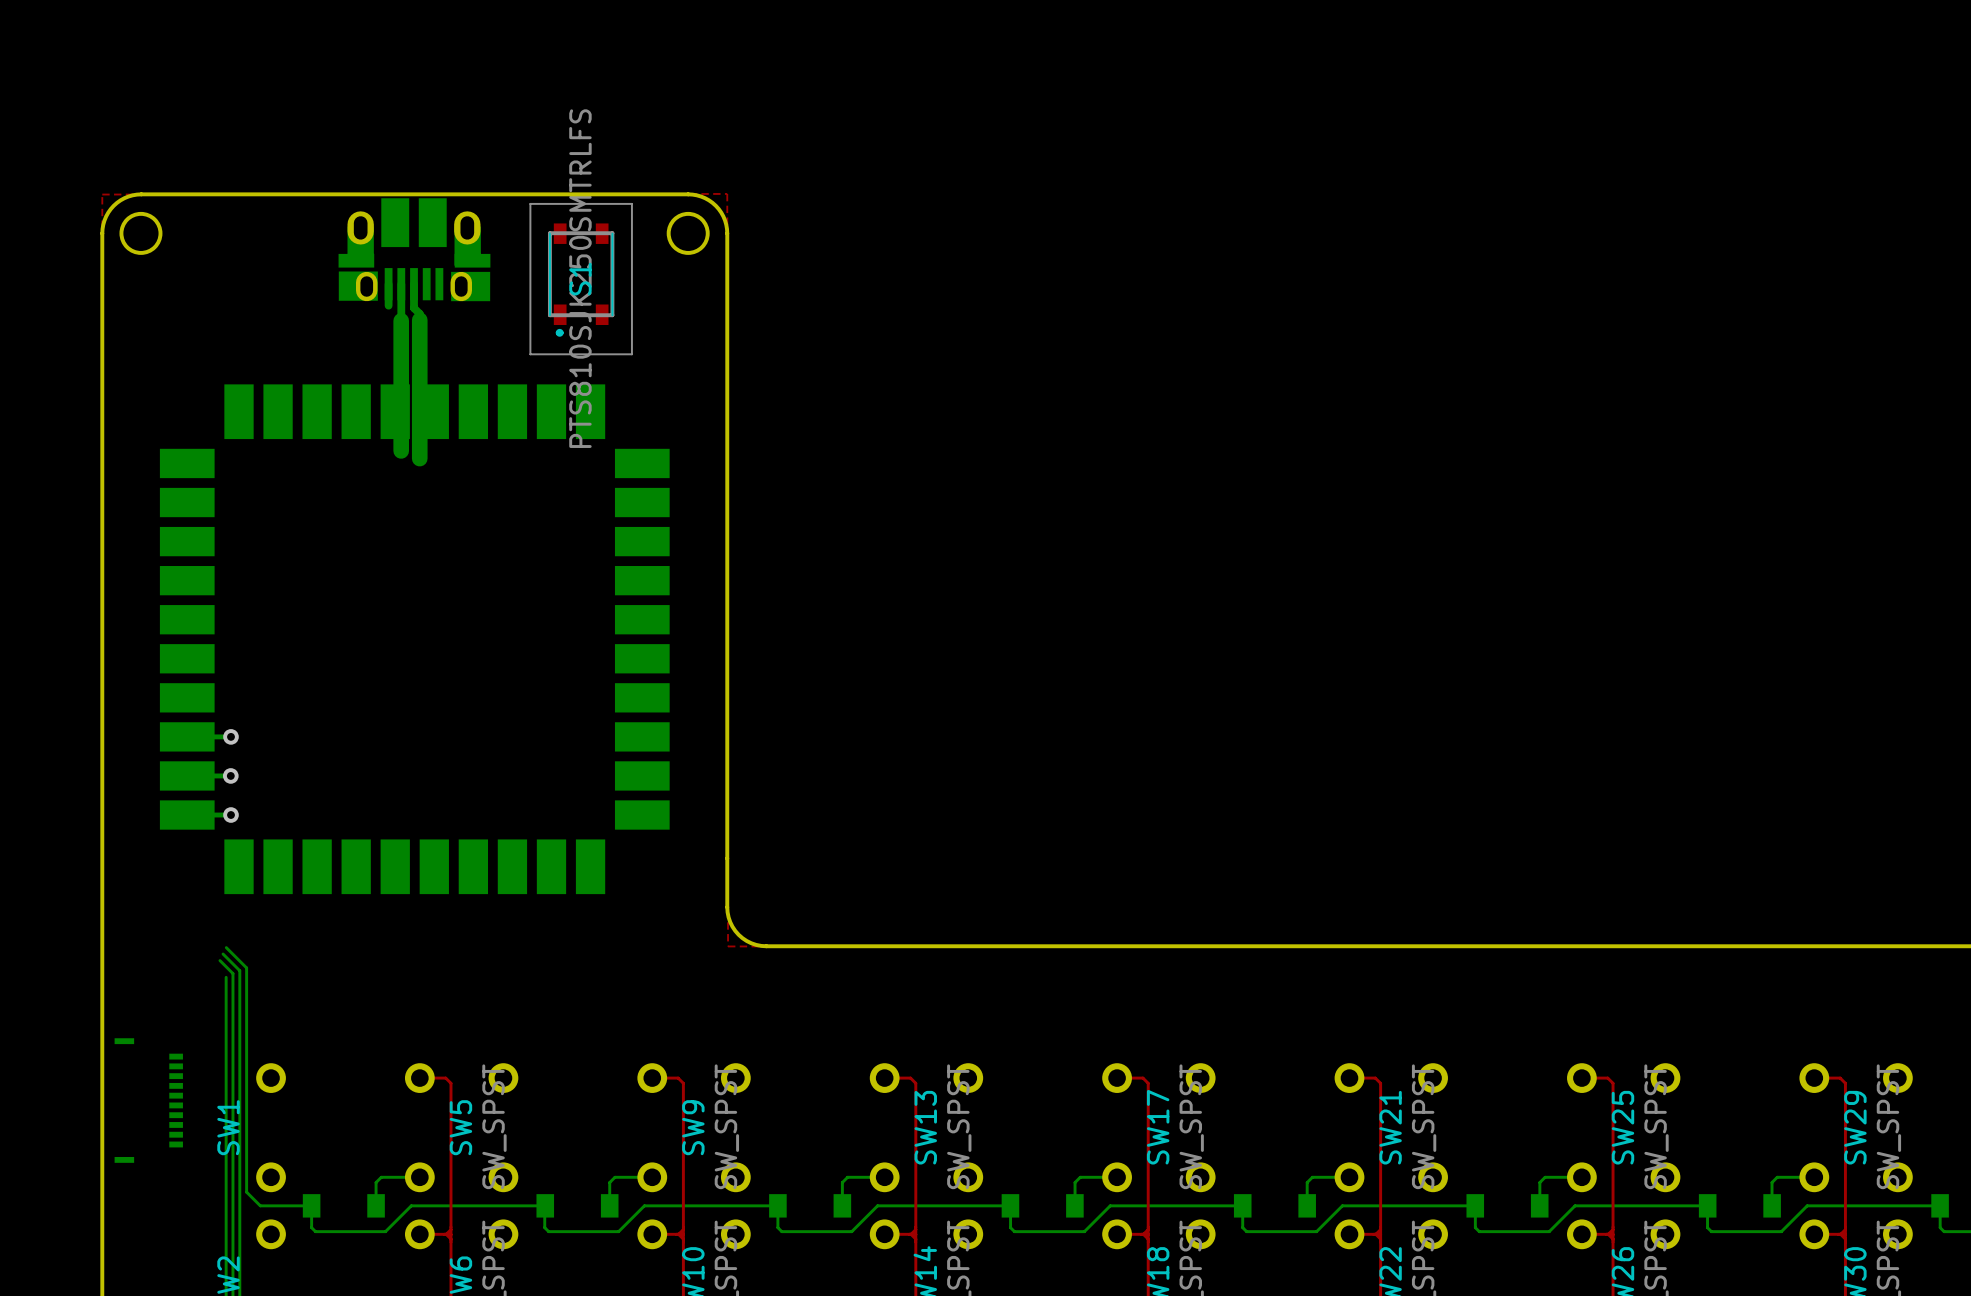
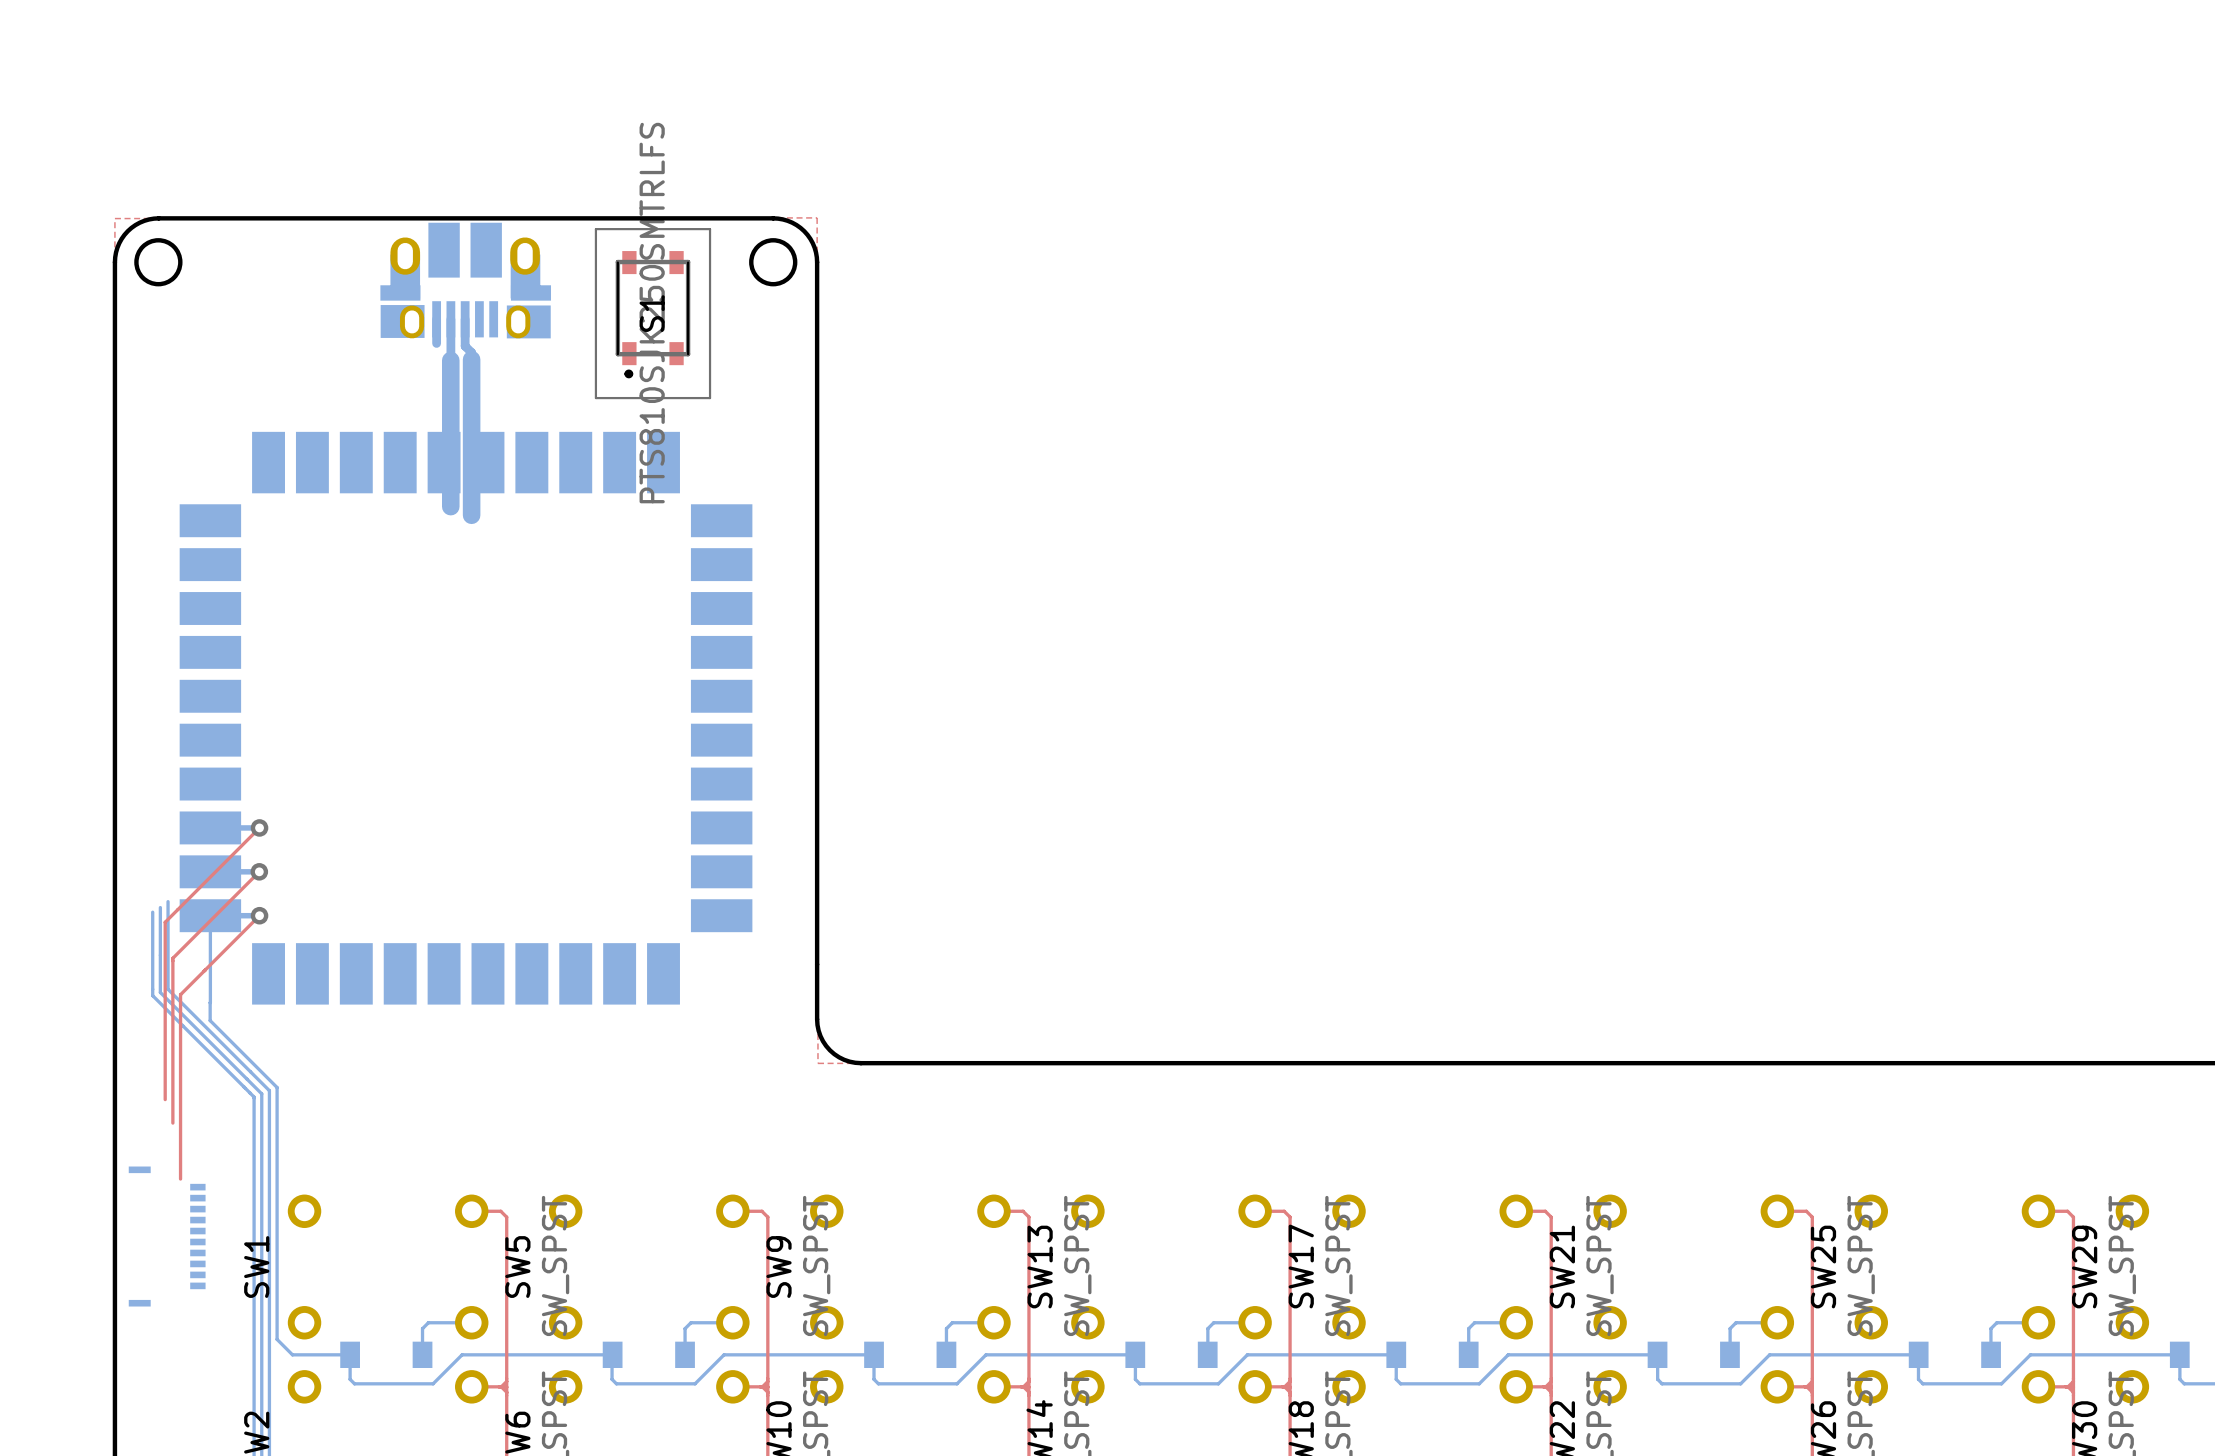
top track: none -> (259, 827) (165, 922) (165, 1099)
top track: none -> (259, 871) (172, 958) (172, 1123)
bottom track: none -> (168, 901) (168, 989) (250, 1071)
bottom track: none -> (160, 907) (160, 992) (247, 1079)
bottom track: none -> (152, 912) (152, 995) (254, 1098)
bottom track: none -> (210, 915) (210, 1002)
top track: none -> (259, 915) (180, 994) (180, 1179)
bottom track: none -> (210, 1002) (210, 1020) (254, 1064)

